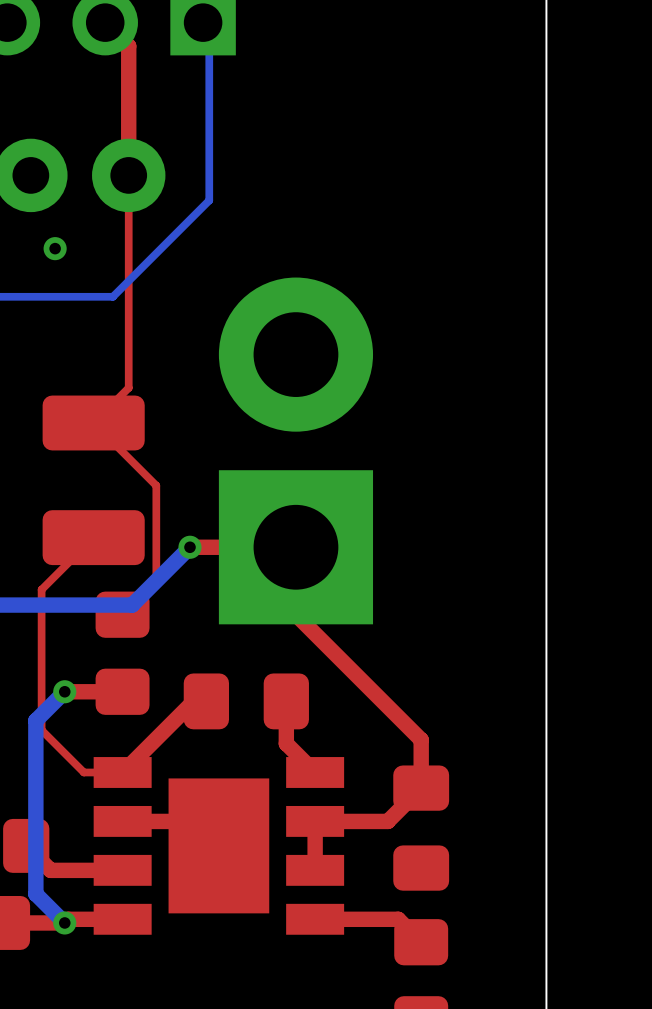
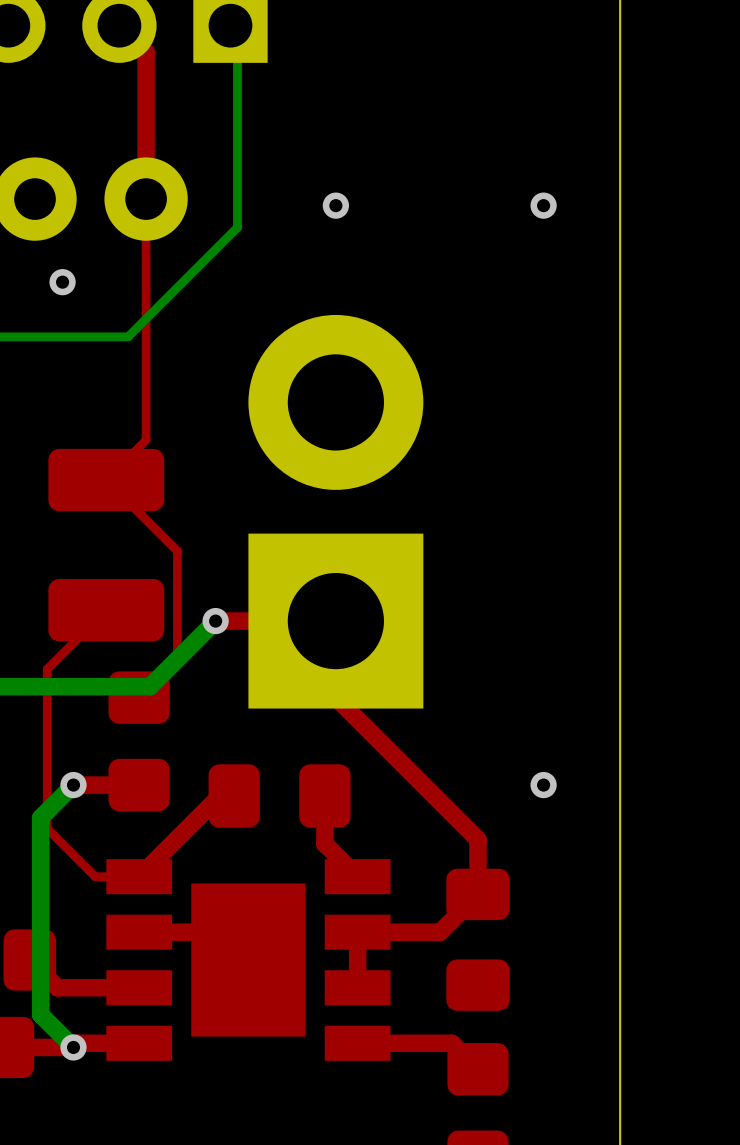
via: none -> (335, 205)
via: none -> (543, 205)
via: none -> (543, 785)

